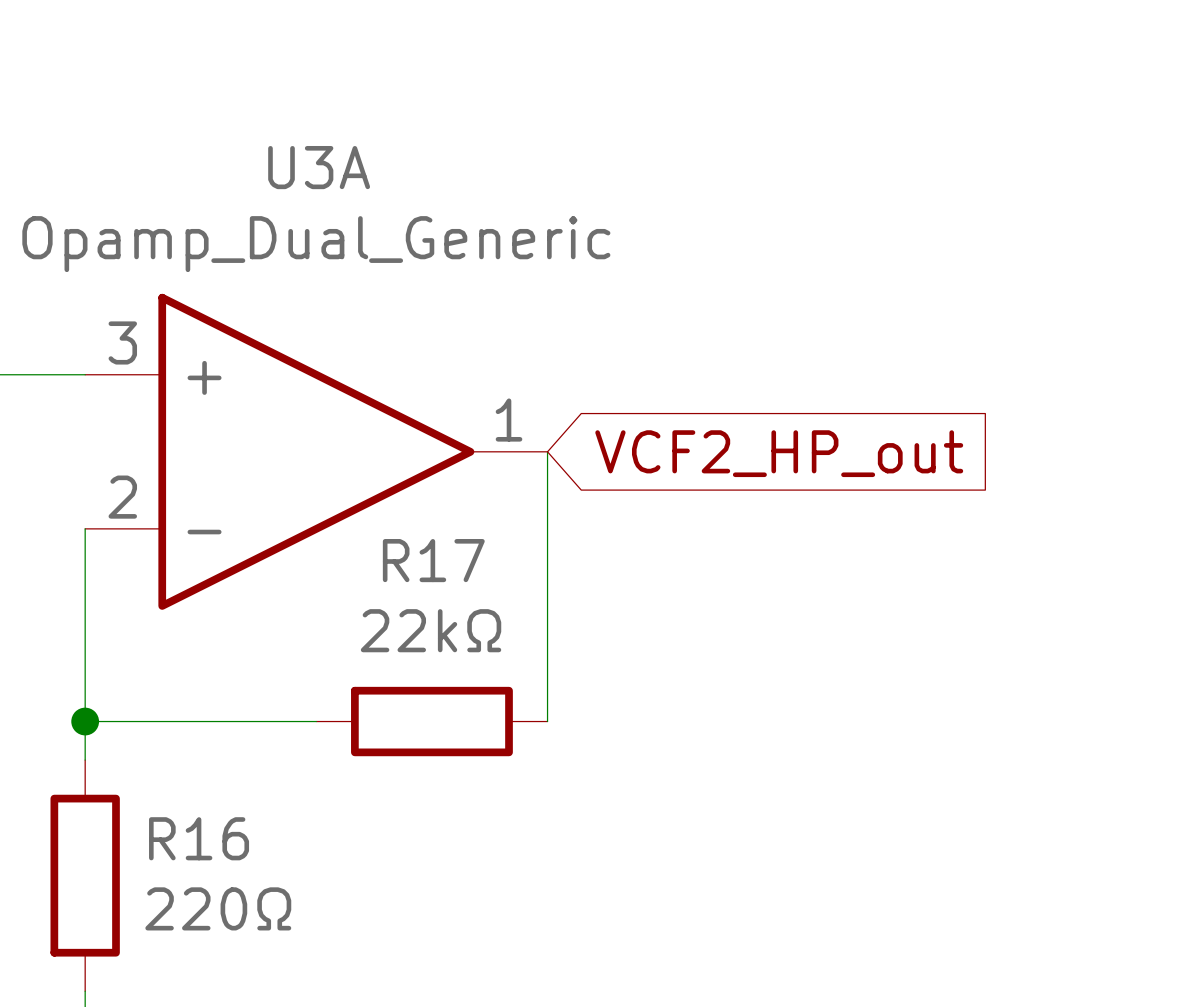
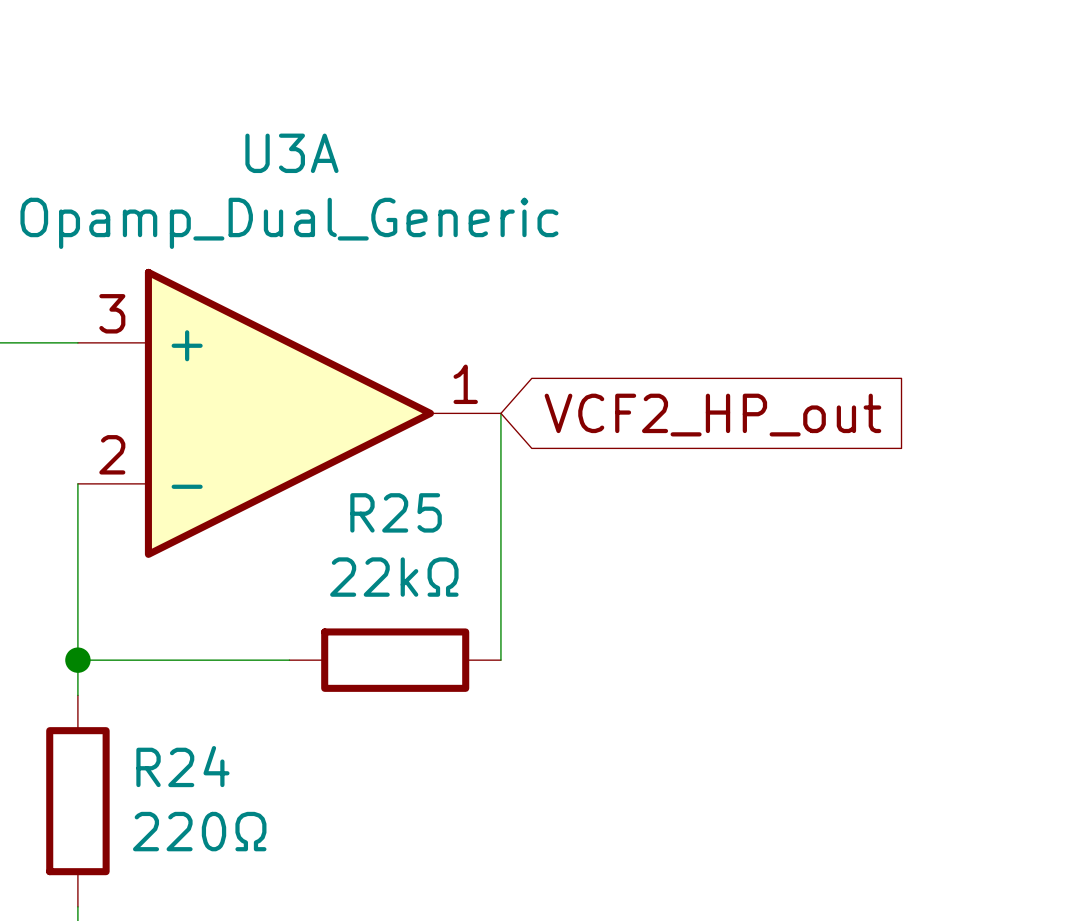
R17 name: R17 (433, 560) -> R25 (396, 512)
R16 name: R16 (199, 838) -> R24 (182, 766)

